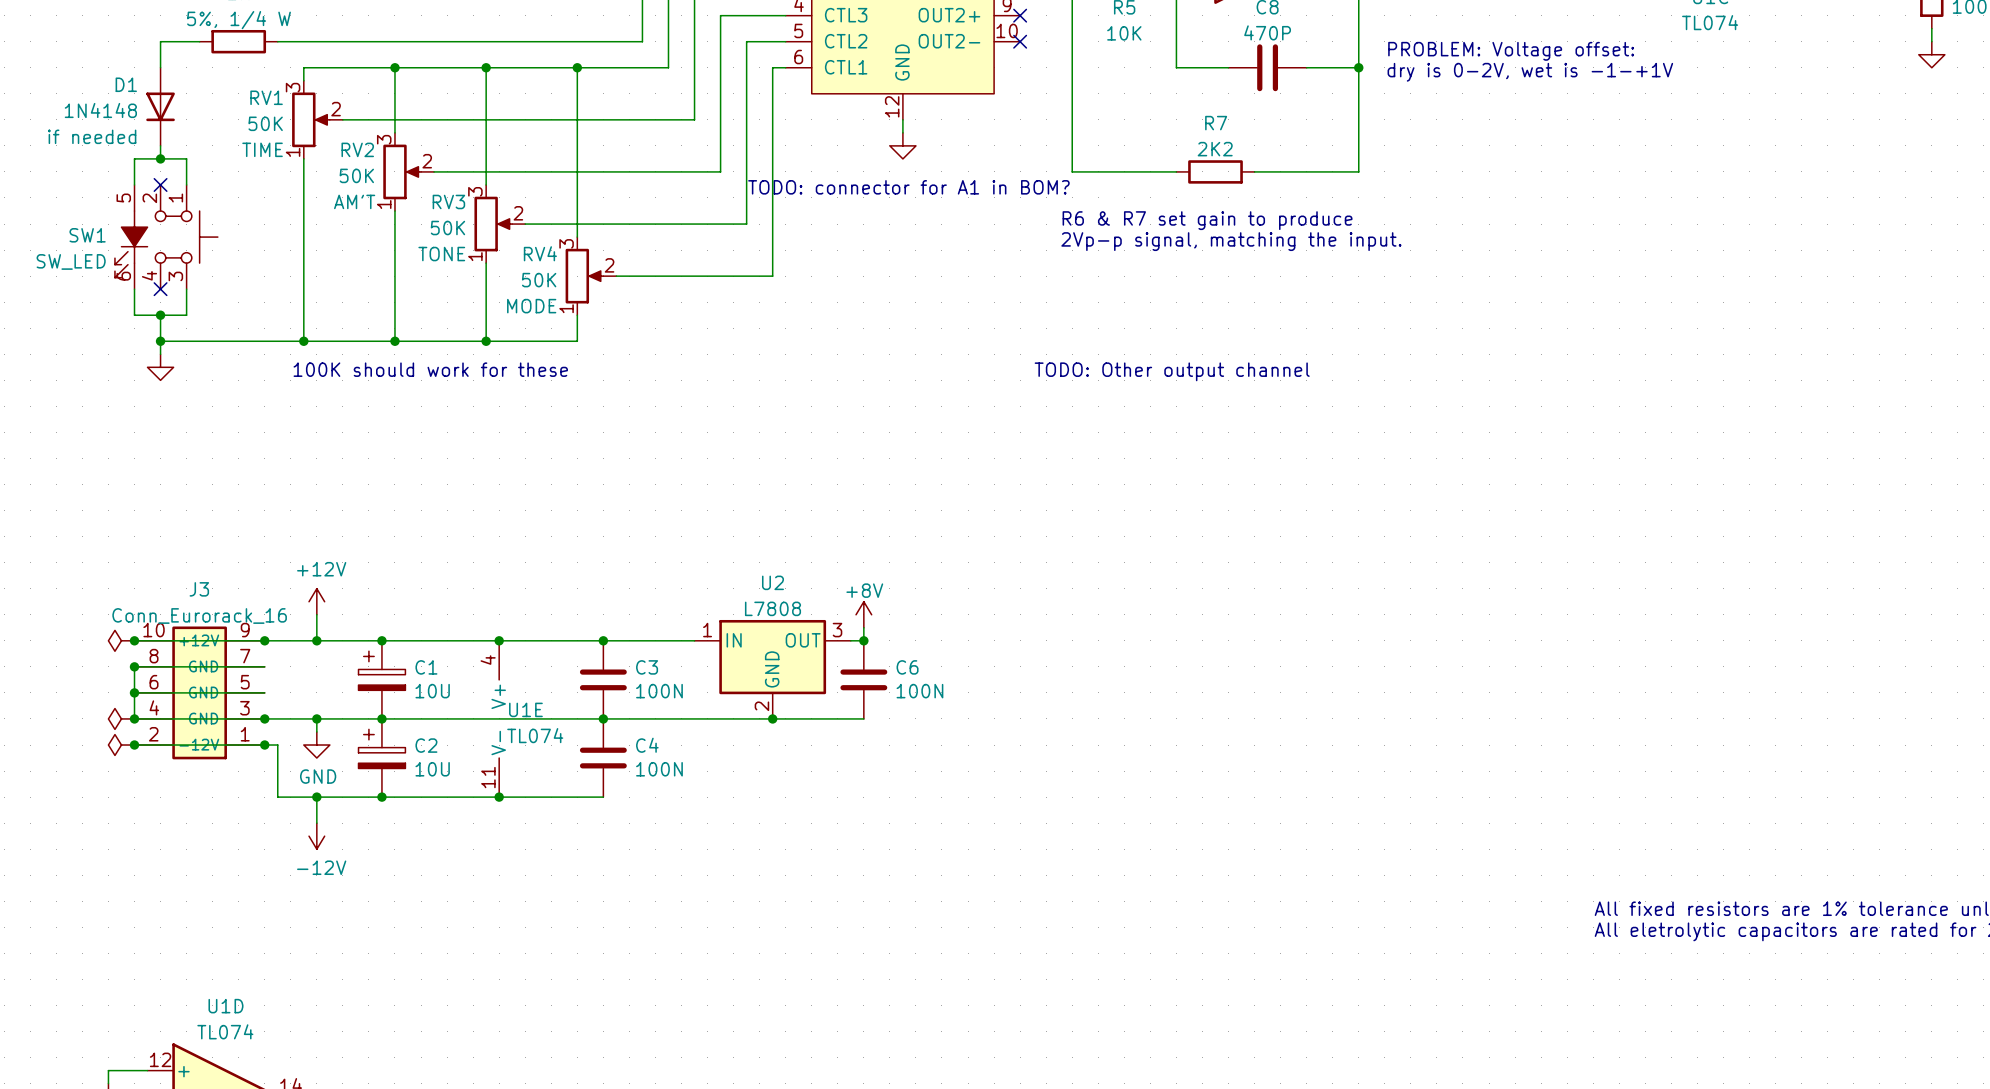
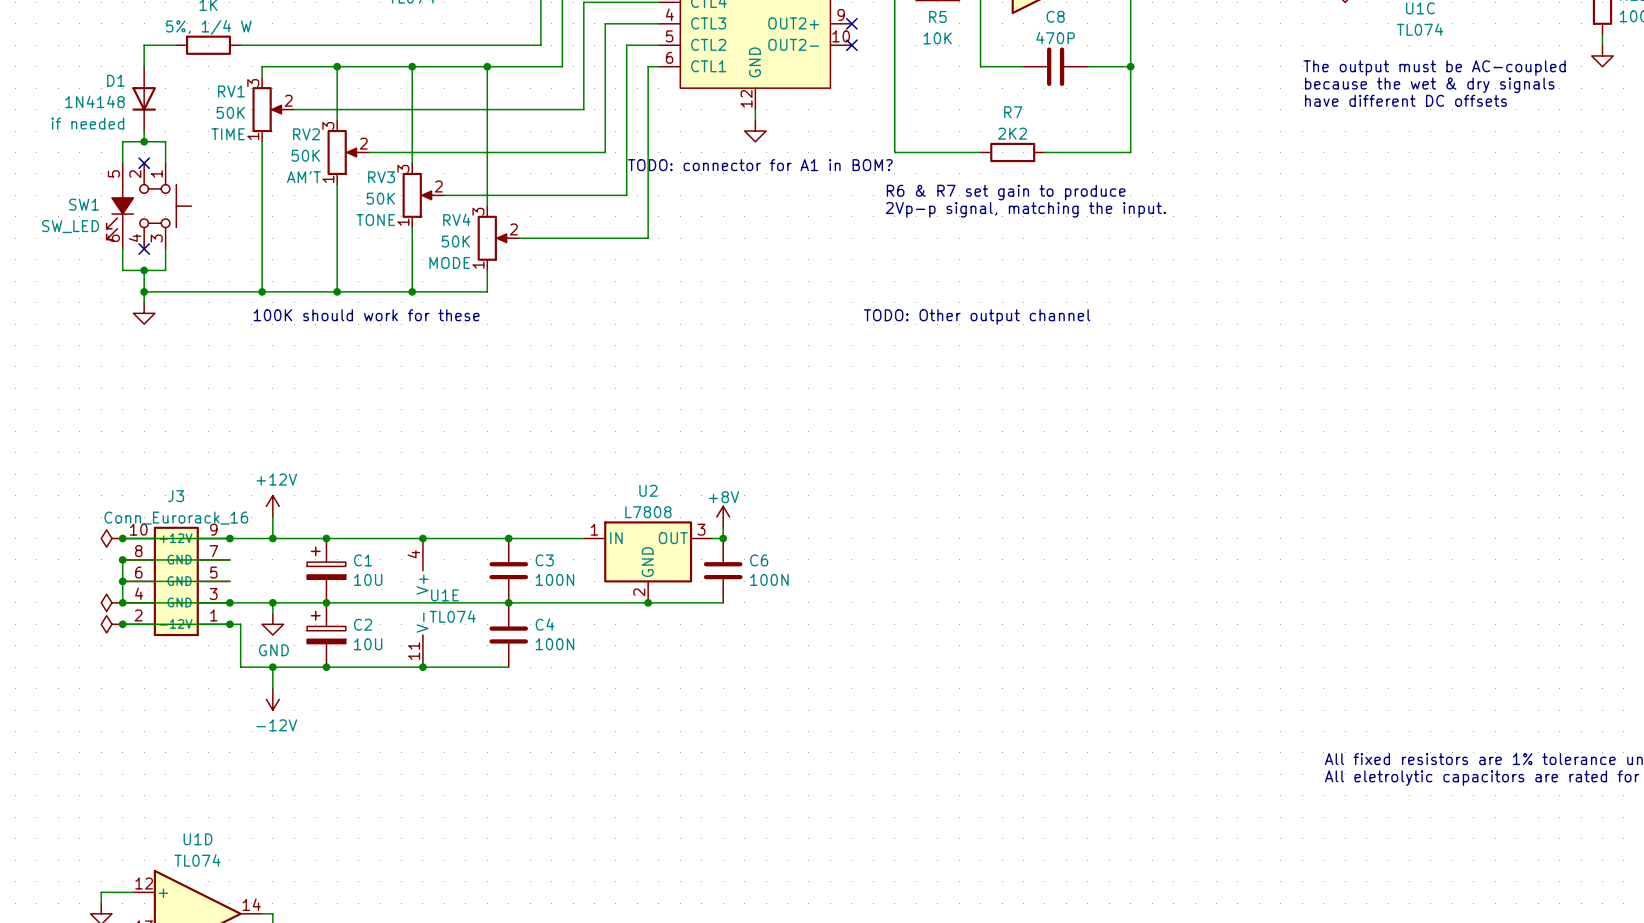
text: PROBLEM: Voltage offset: (1511, 51) -> none
text: none -> The output must be AC-coupled (1434, 68)
text: dry is 0-2V, wet is -1-+1V (1530, 72) -> none
text: none -> because the wet & dry signals (1429, 85)
text: none -> have different DC offsets (1405, 100)

